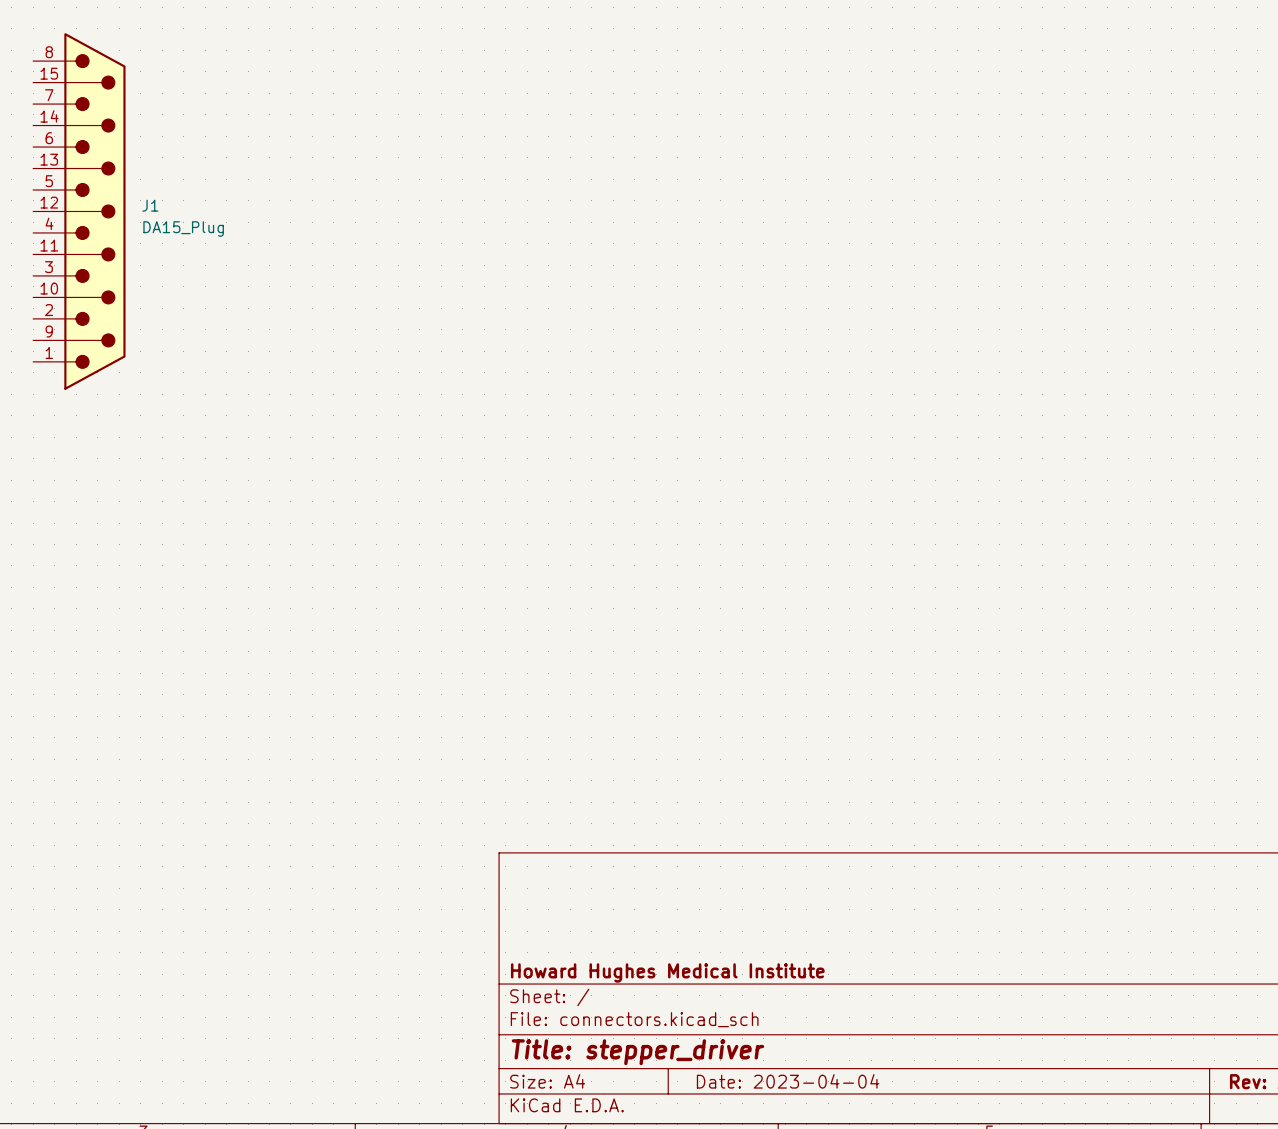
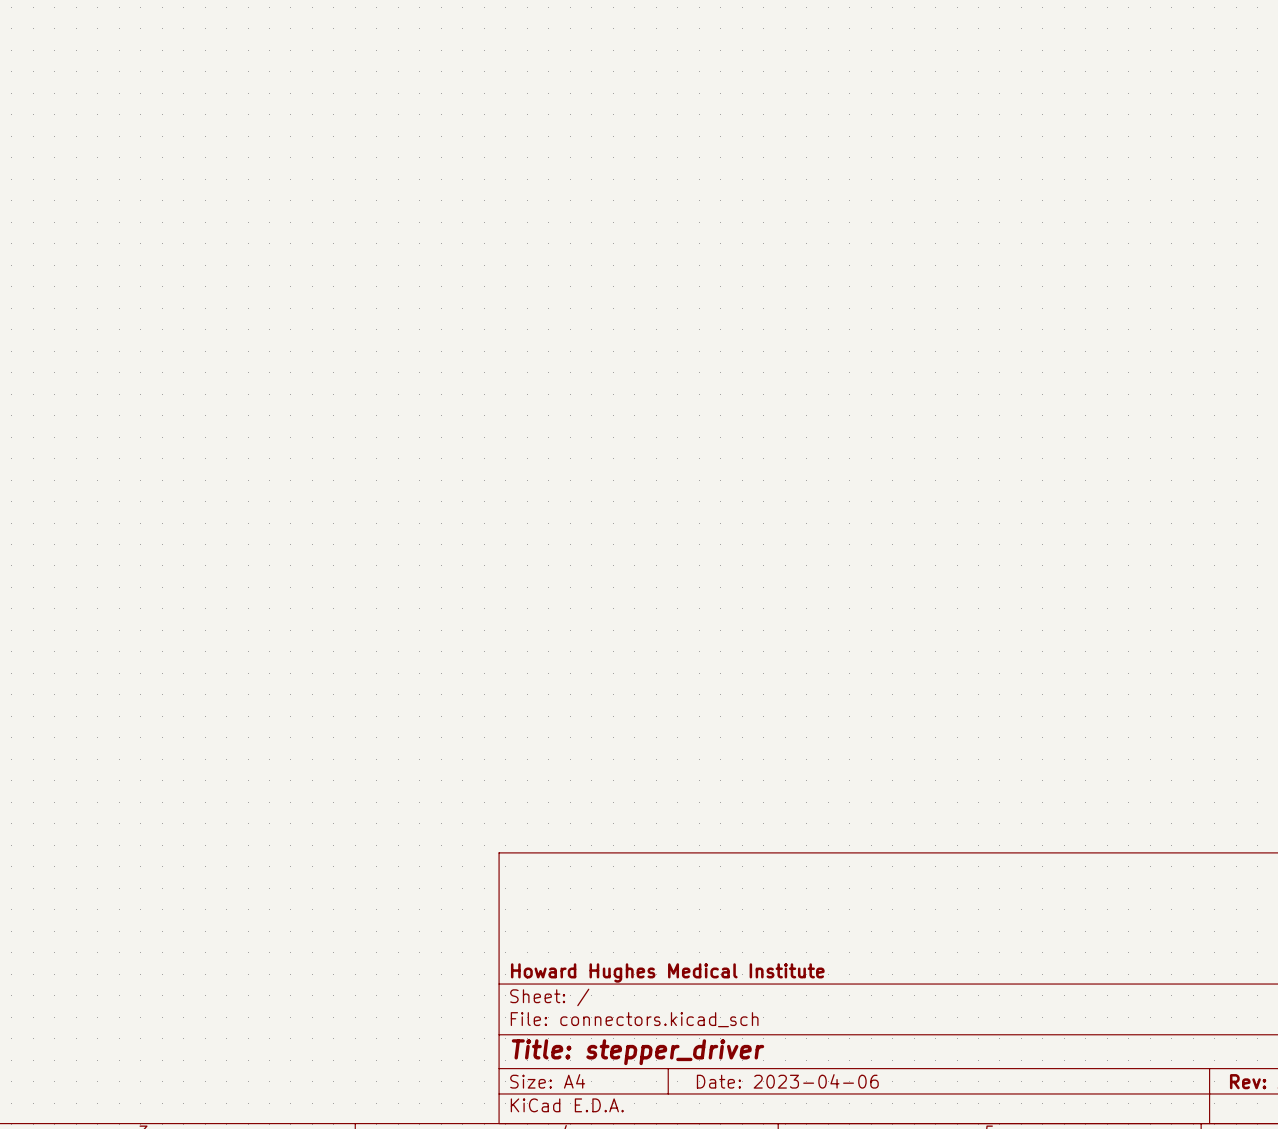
J1: DA15_Plug (79, 211) -> none
title block: Date: 2023-04-04 (788, 1081) -> Date: 2023-04-06 (787, 1081)

